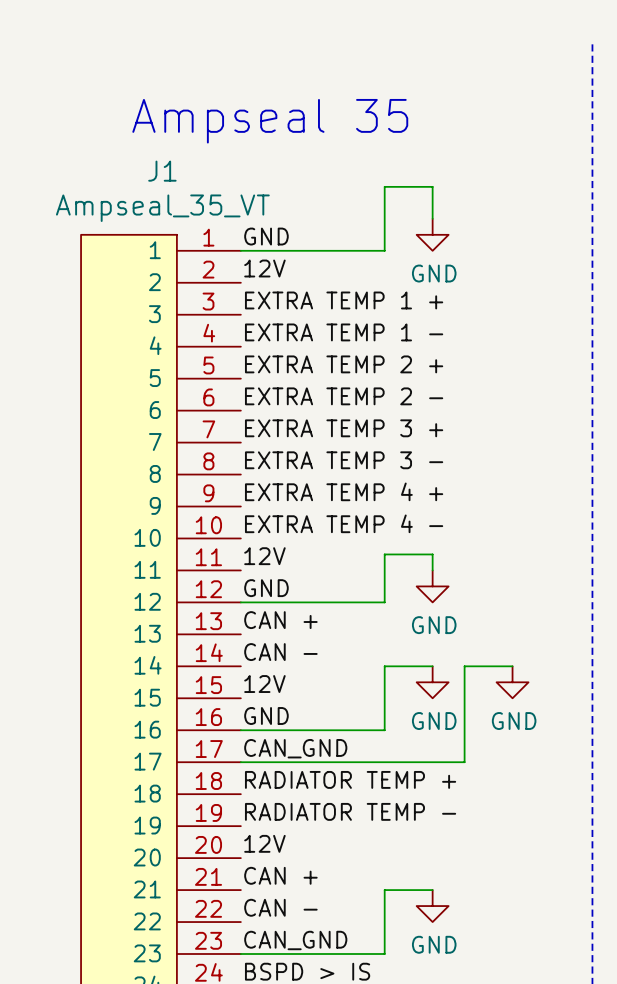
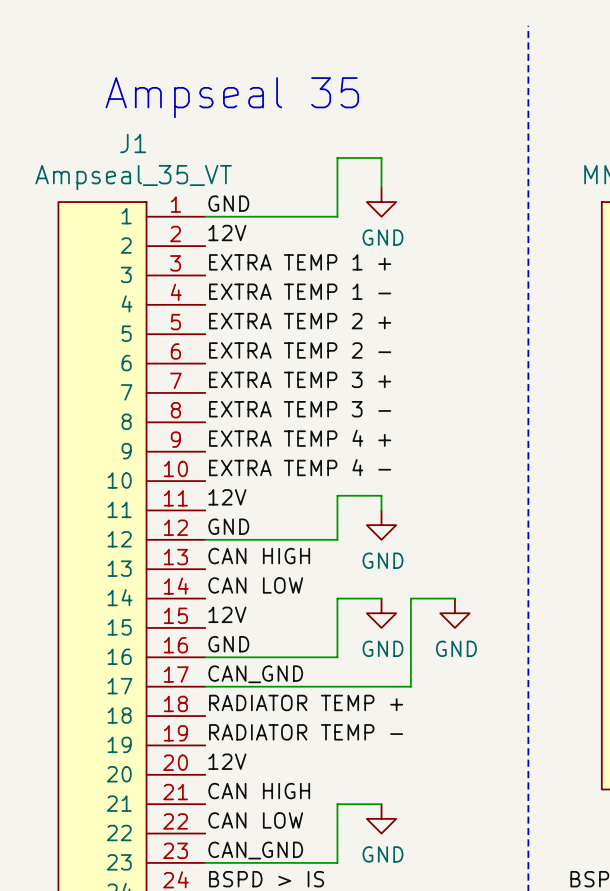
label: CAN + (280, 620) -> CAN HIGH (259, 556)
label: CAN - (280, 652) -> CAN LOW (255, 585)
label: CAN + (280, 875) -> CAN HIGH (259, 791)
label: CAN - (280, 907) -> CAN LOW (255, 820)

